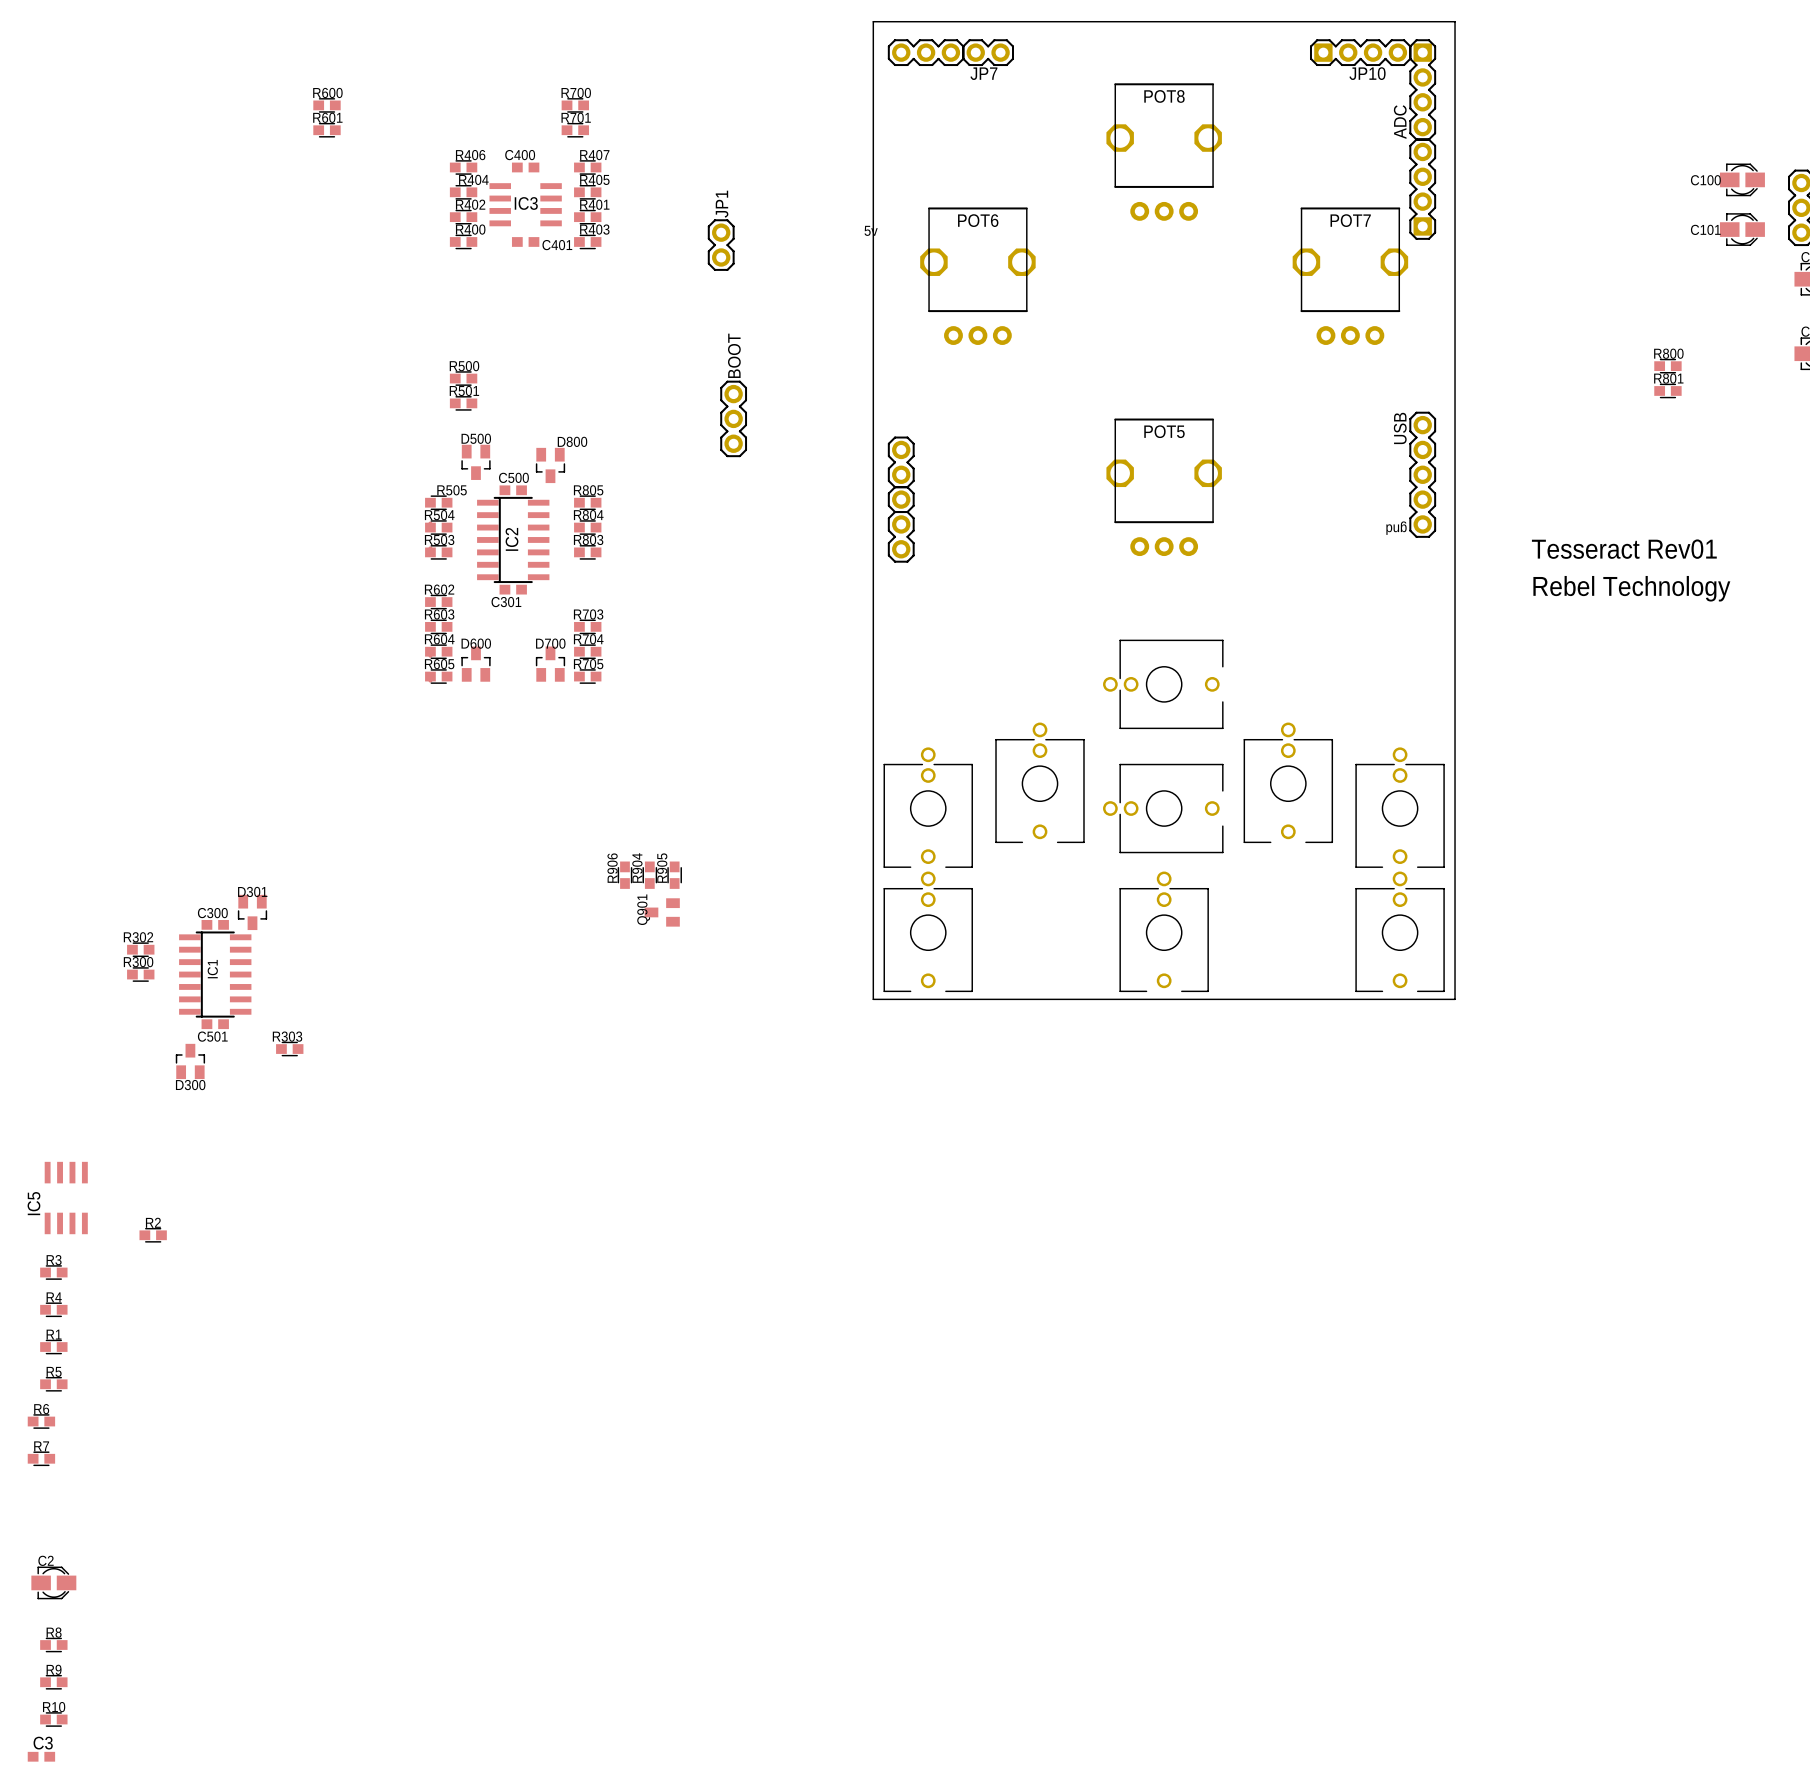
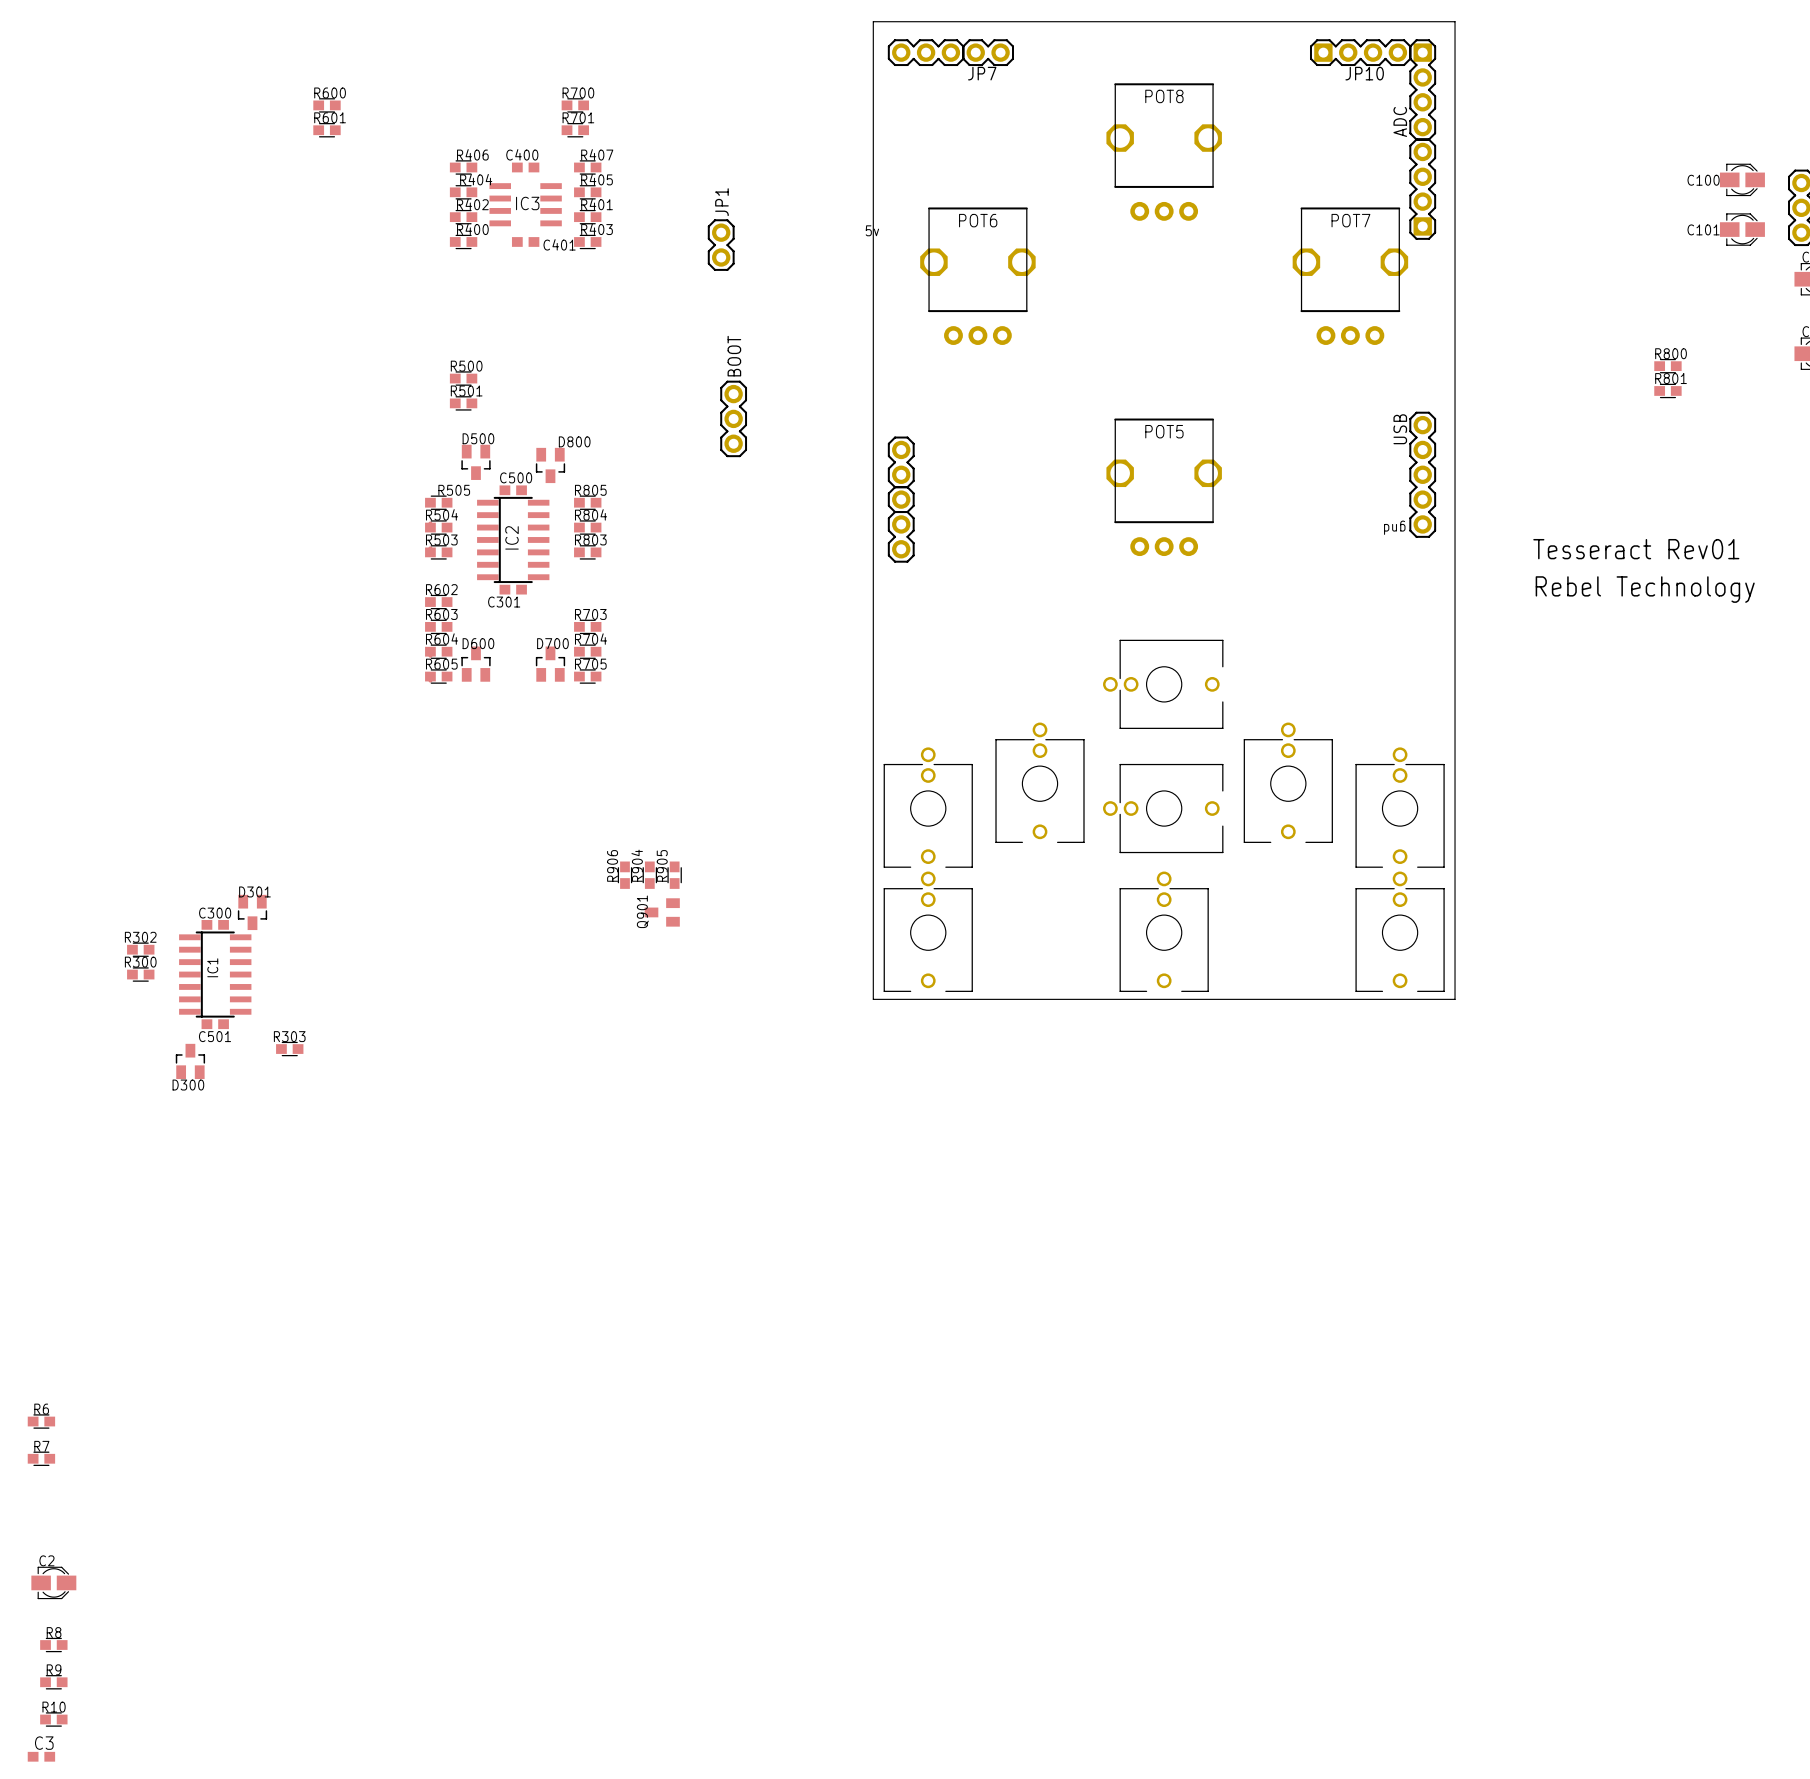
IC5: (66, 1198) -> none
R2: (153, 1235) -> none
R3: (53, 1272) -> none
R4: (53, 1309) -> none
R1: (53, 1347) -> none
R5: (53, 1384) -> none

